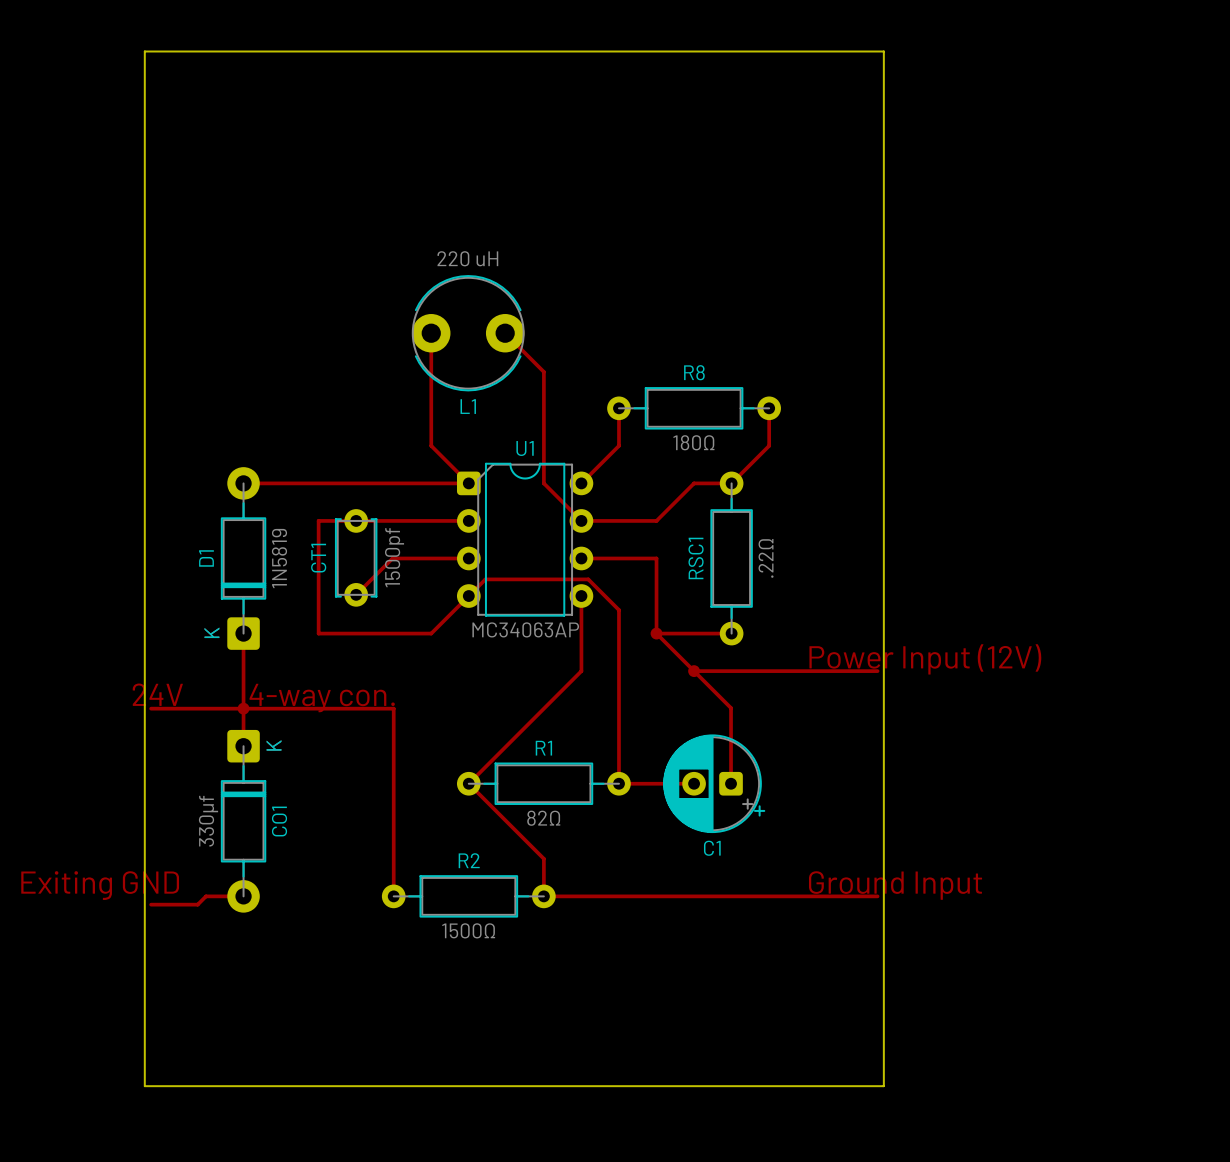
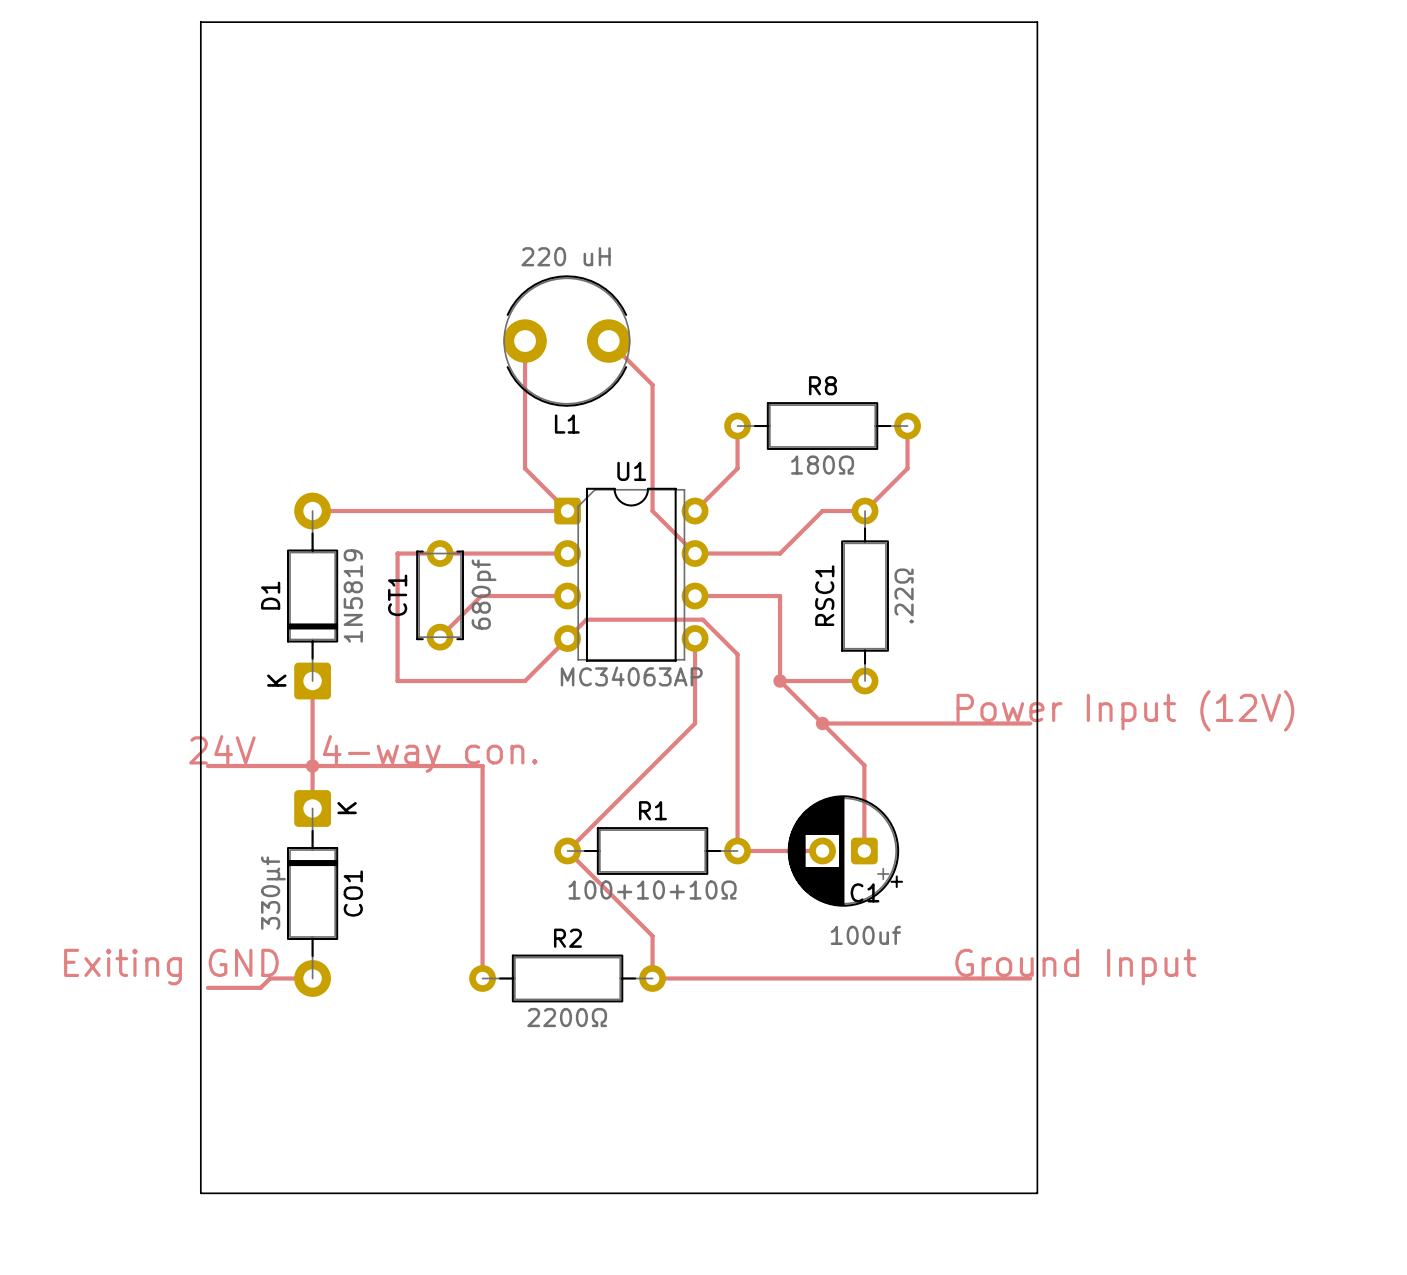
CT1 value: 1500pf (394, 557) -> 680pf (484, 594)
R1 value: 82Ω (543, 818) -> 100+10+10Ω (652, 890)
C1 name position: C1 (712, 848) -> C1 (865, 892)
text: none -> 100uf (865, 935)
R2 value: 1500Ω (468, 930) -> 2200Ω (567, 1017)

